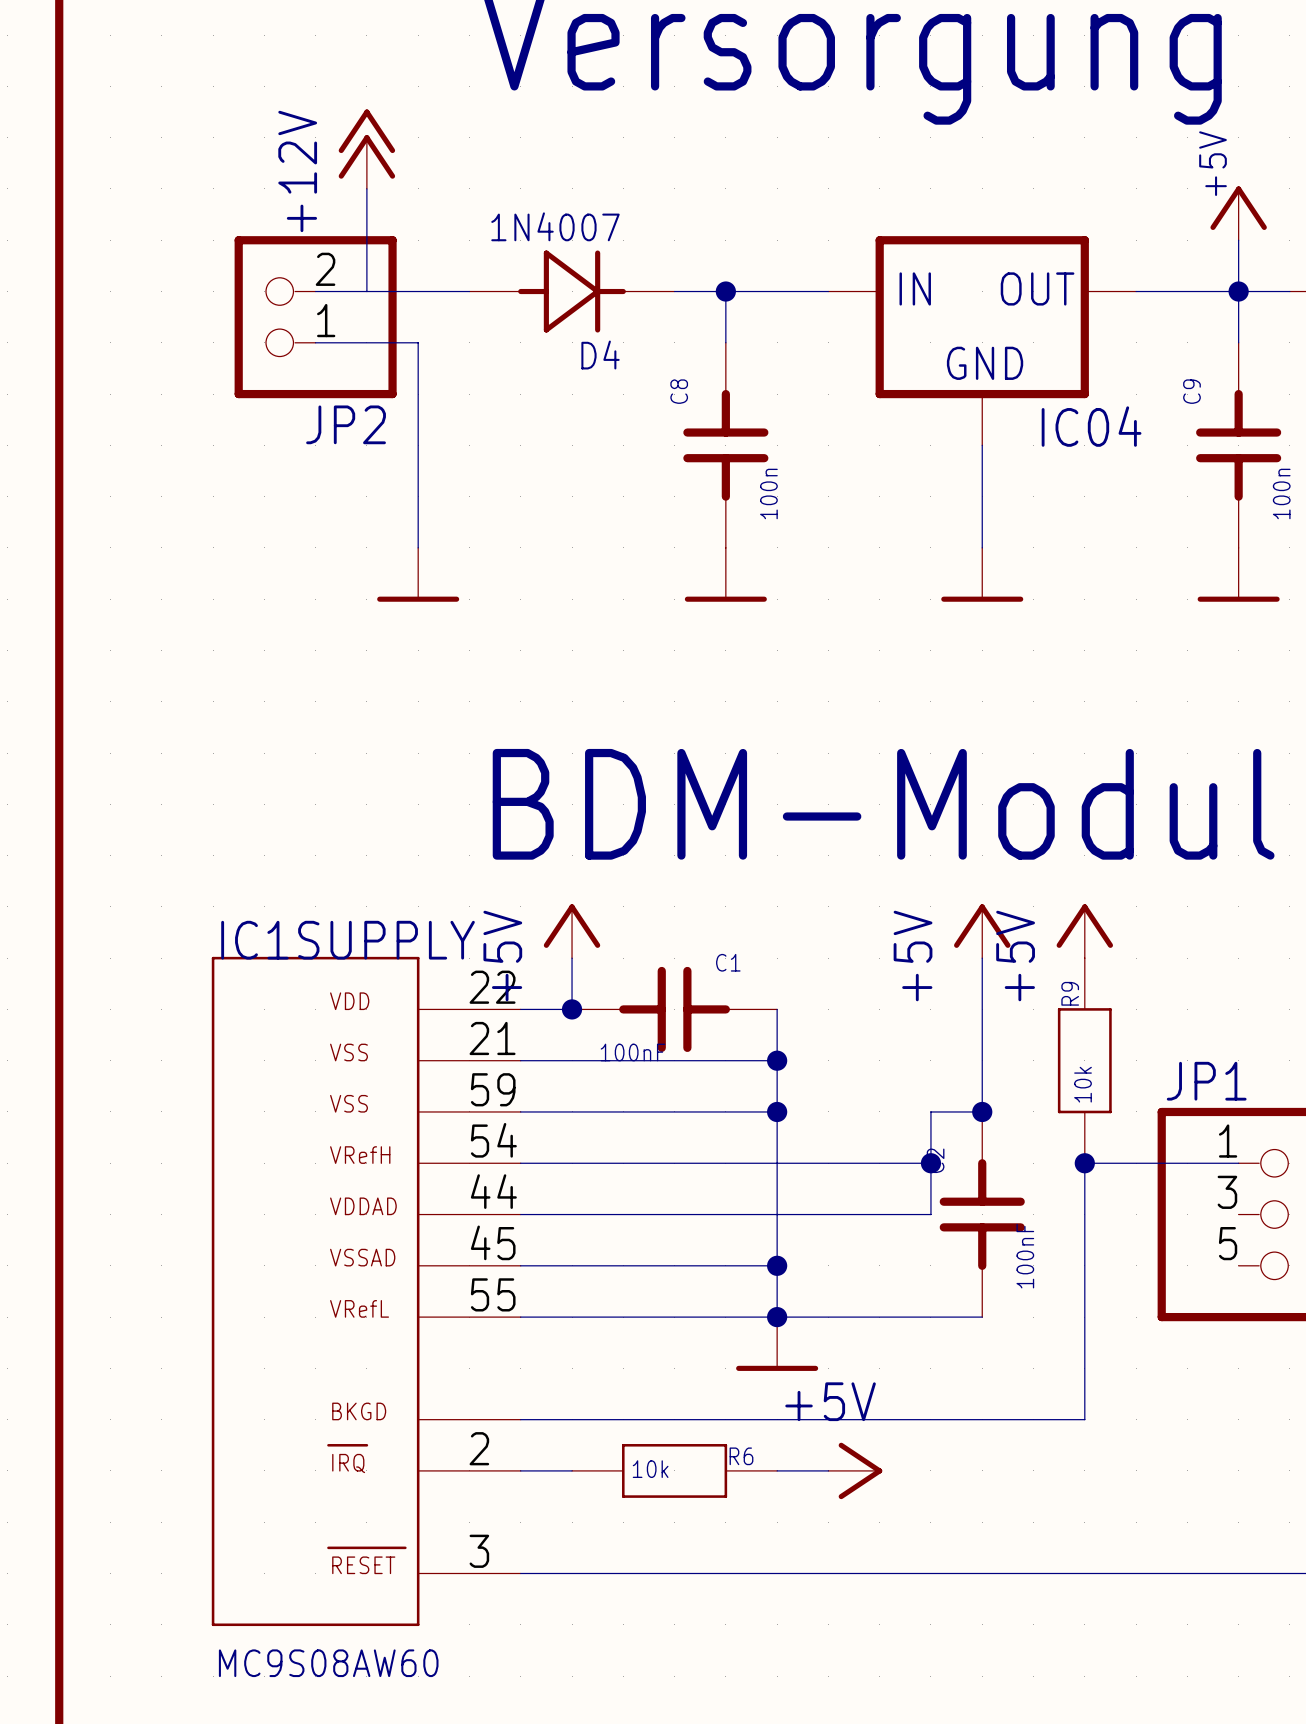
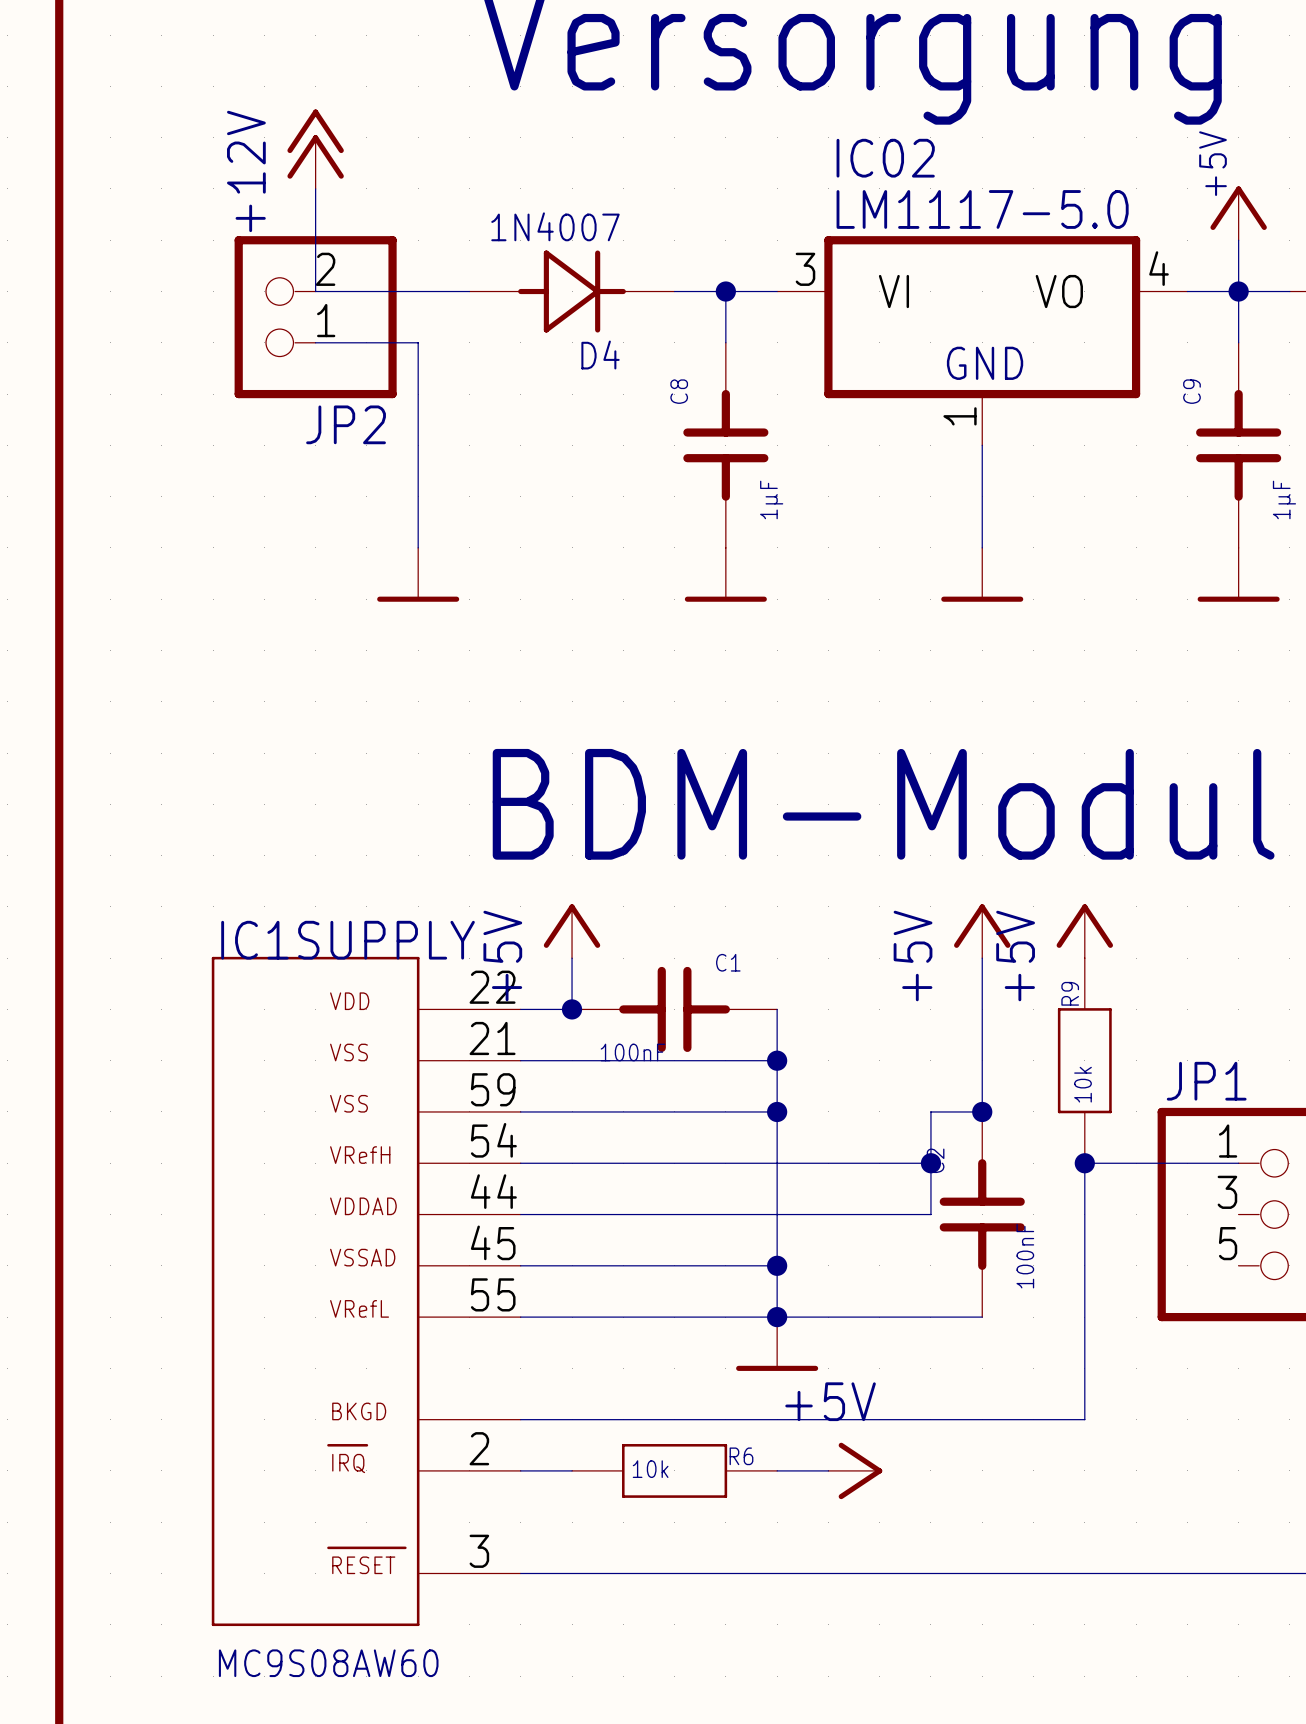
power symbol position: +12V (366, 149) -> +12V (315, 149)
wire: (366, 188) (366, 291) -> (315, 188) (315, 291)
IC04: (982, 340) -> none
IC02: none -> LM1117-5.0 (982, 340)
C8 value: 100n (768, 493) -> 1µF (771, 499)
C9 value: 100n (1281, 493) -> 1µF (1284, 499)

